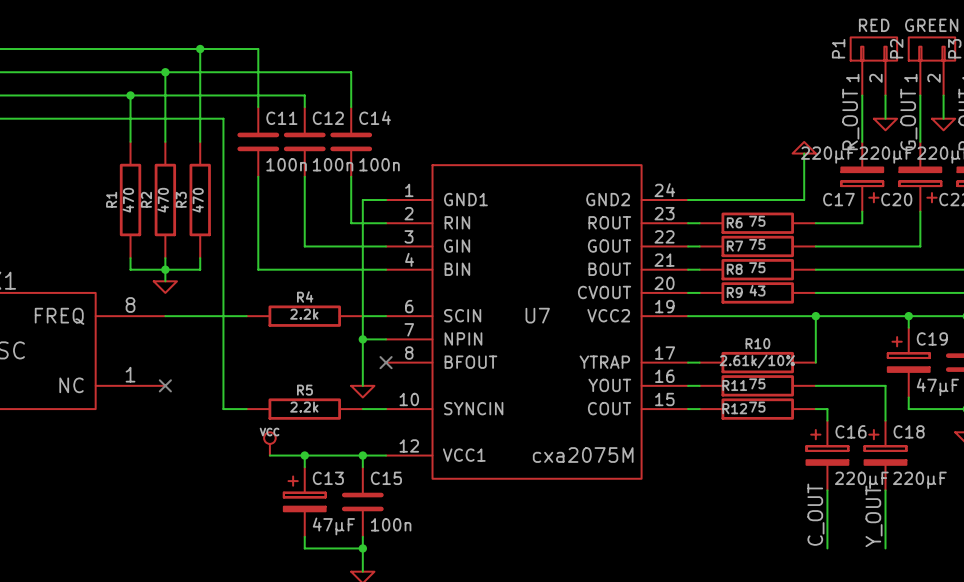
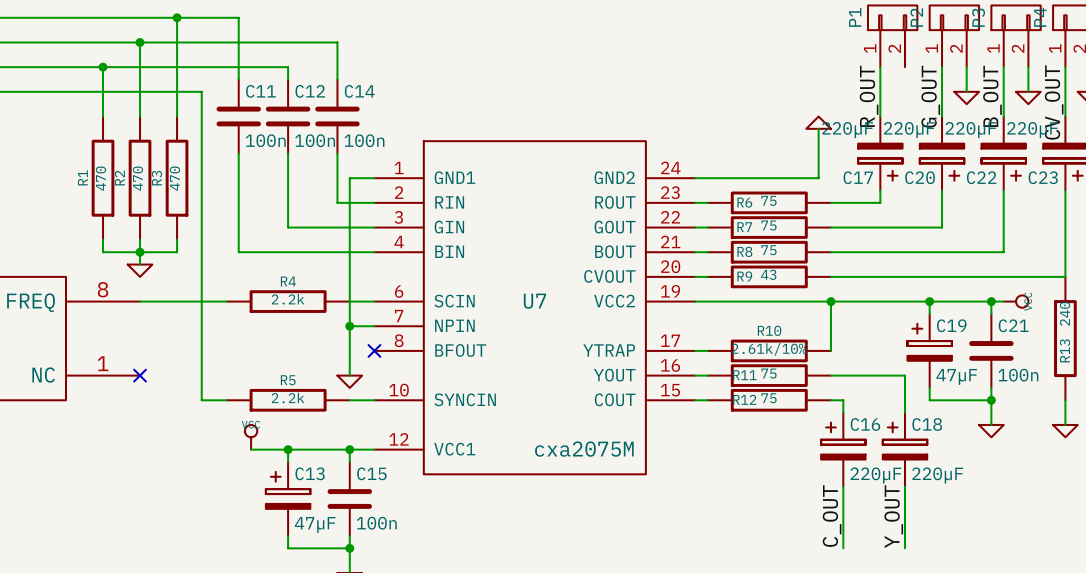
wire: (885, 95) (885, 118) -> none
power symbol: (885, 124) -> none

